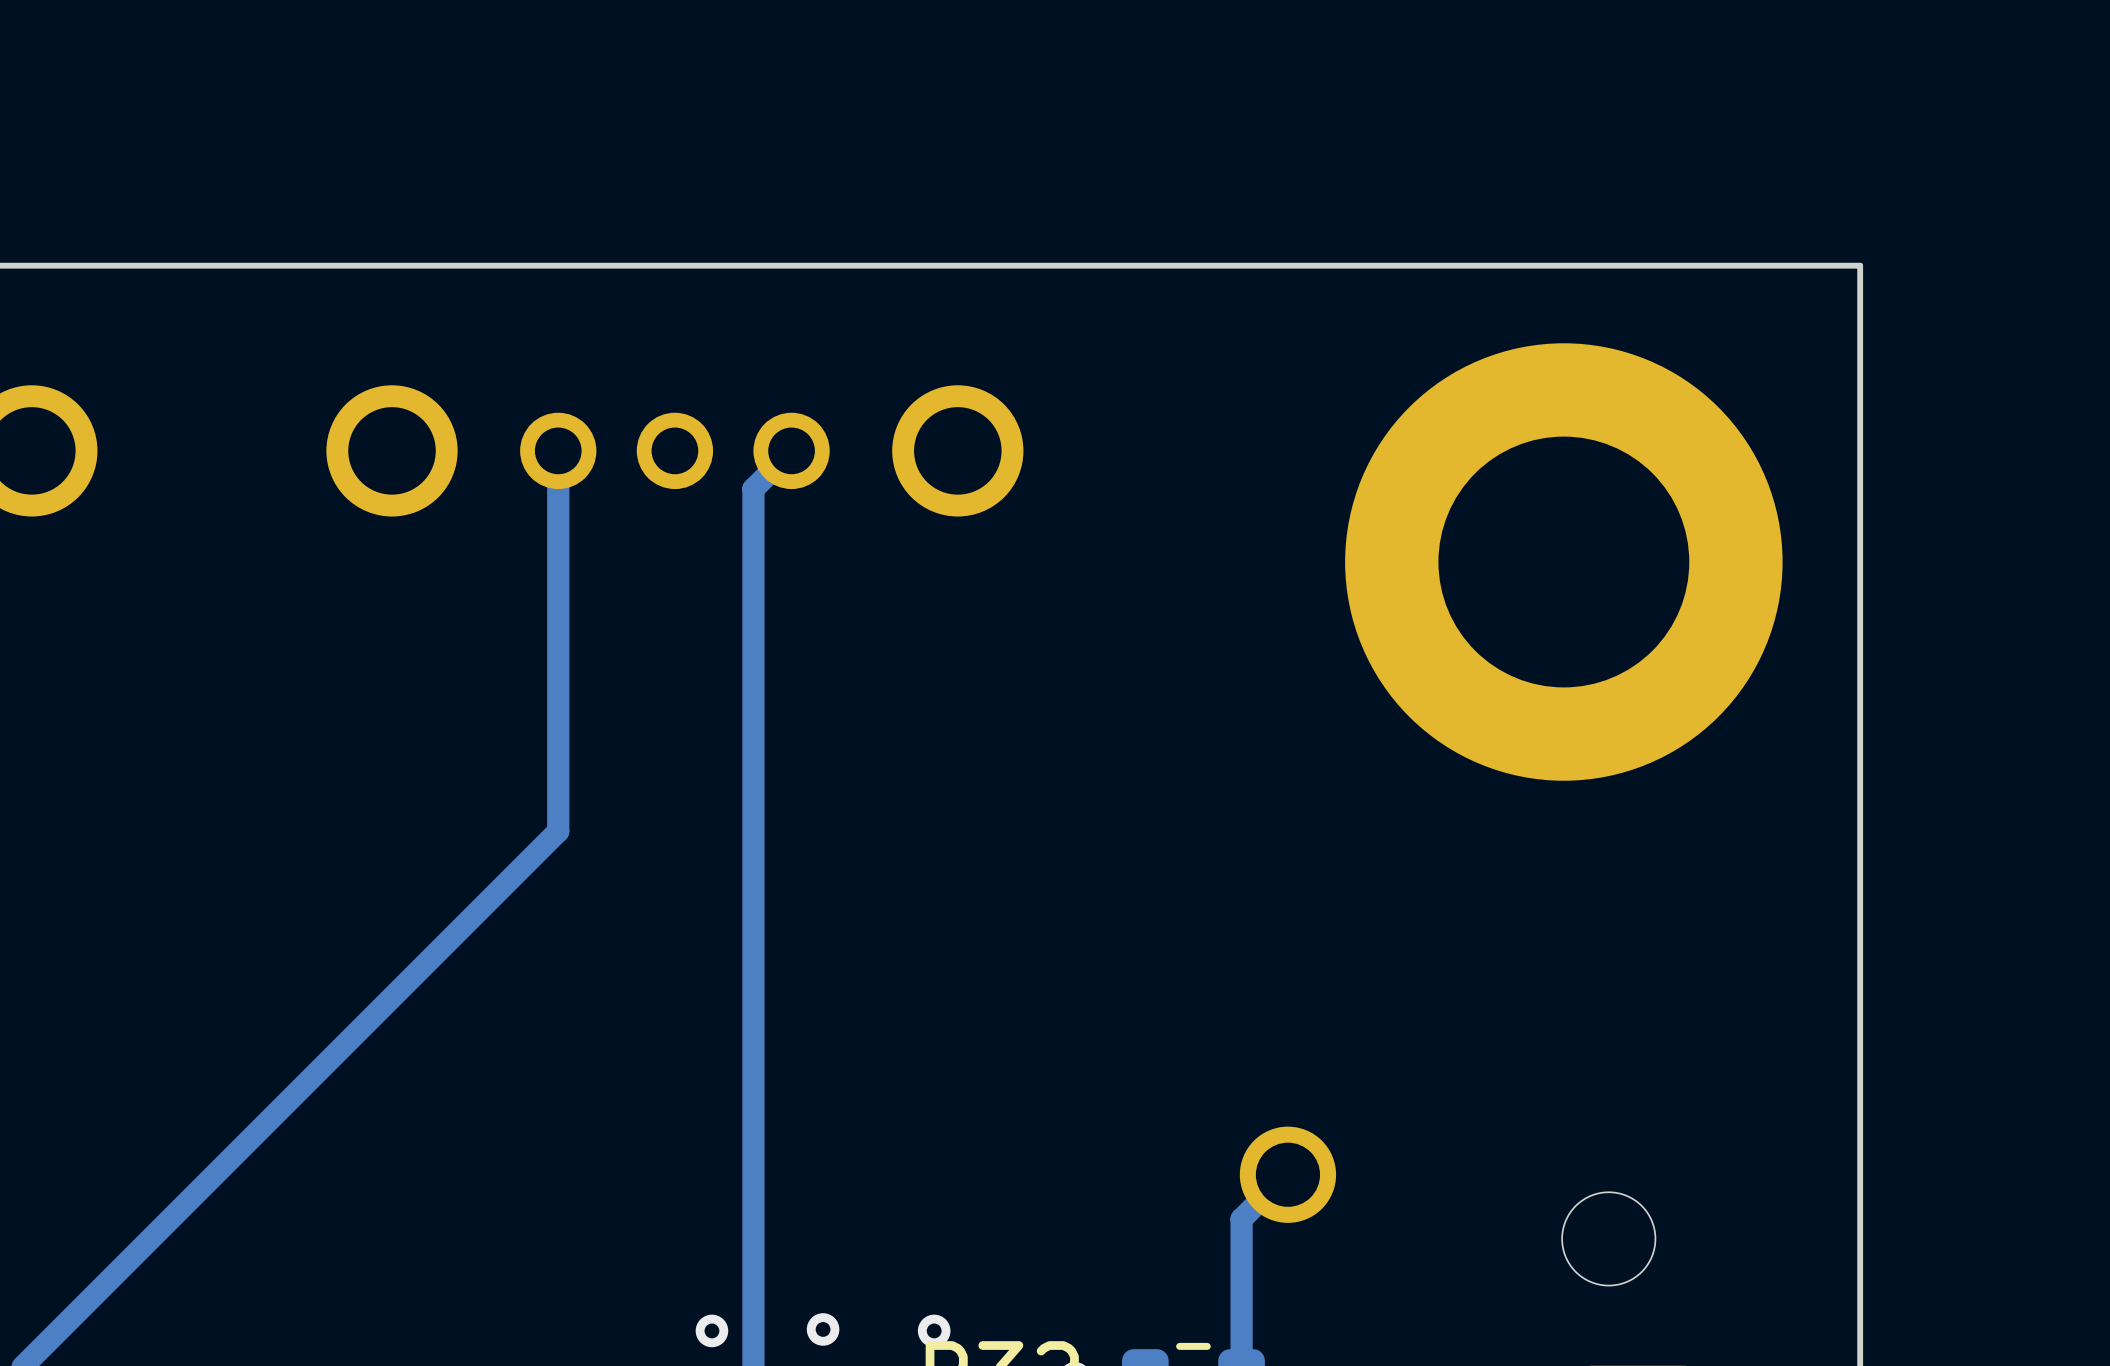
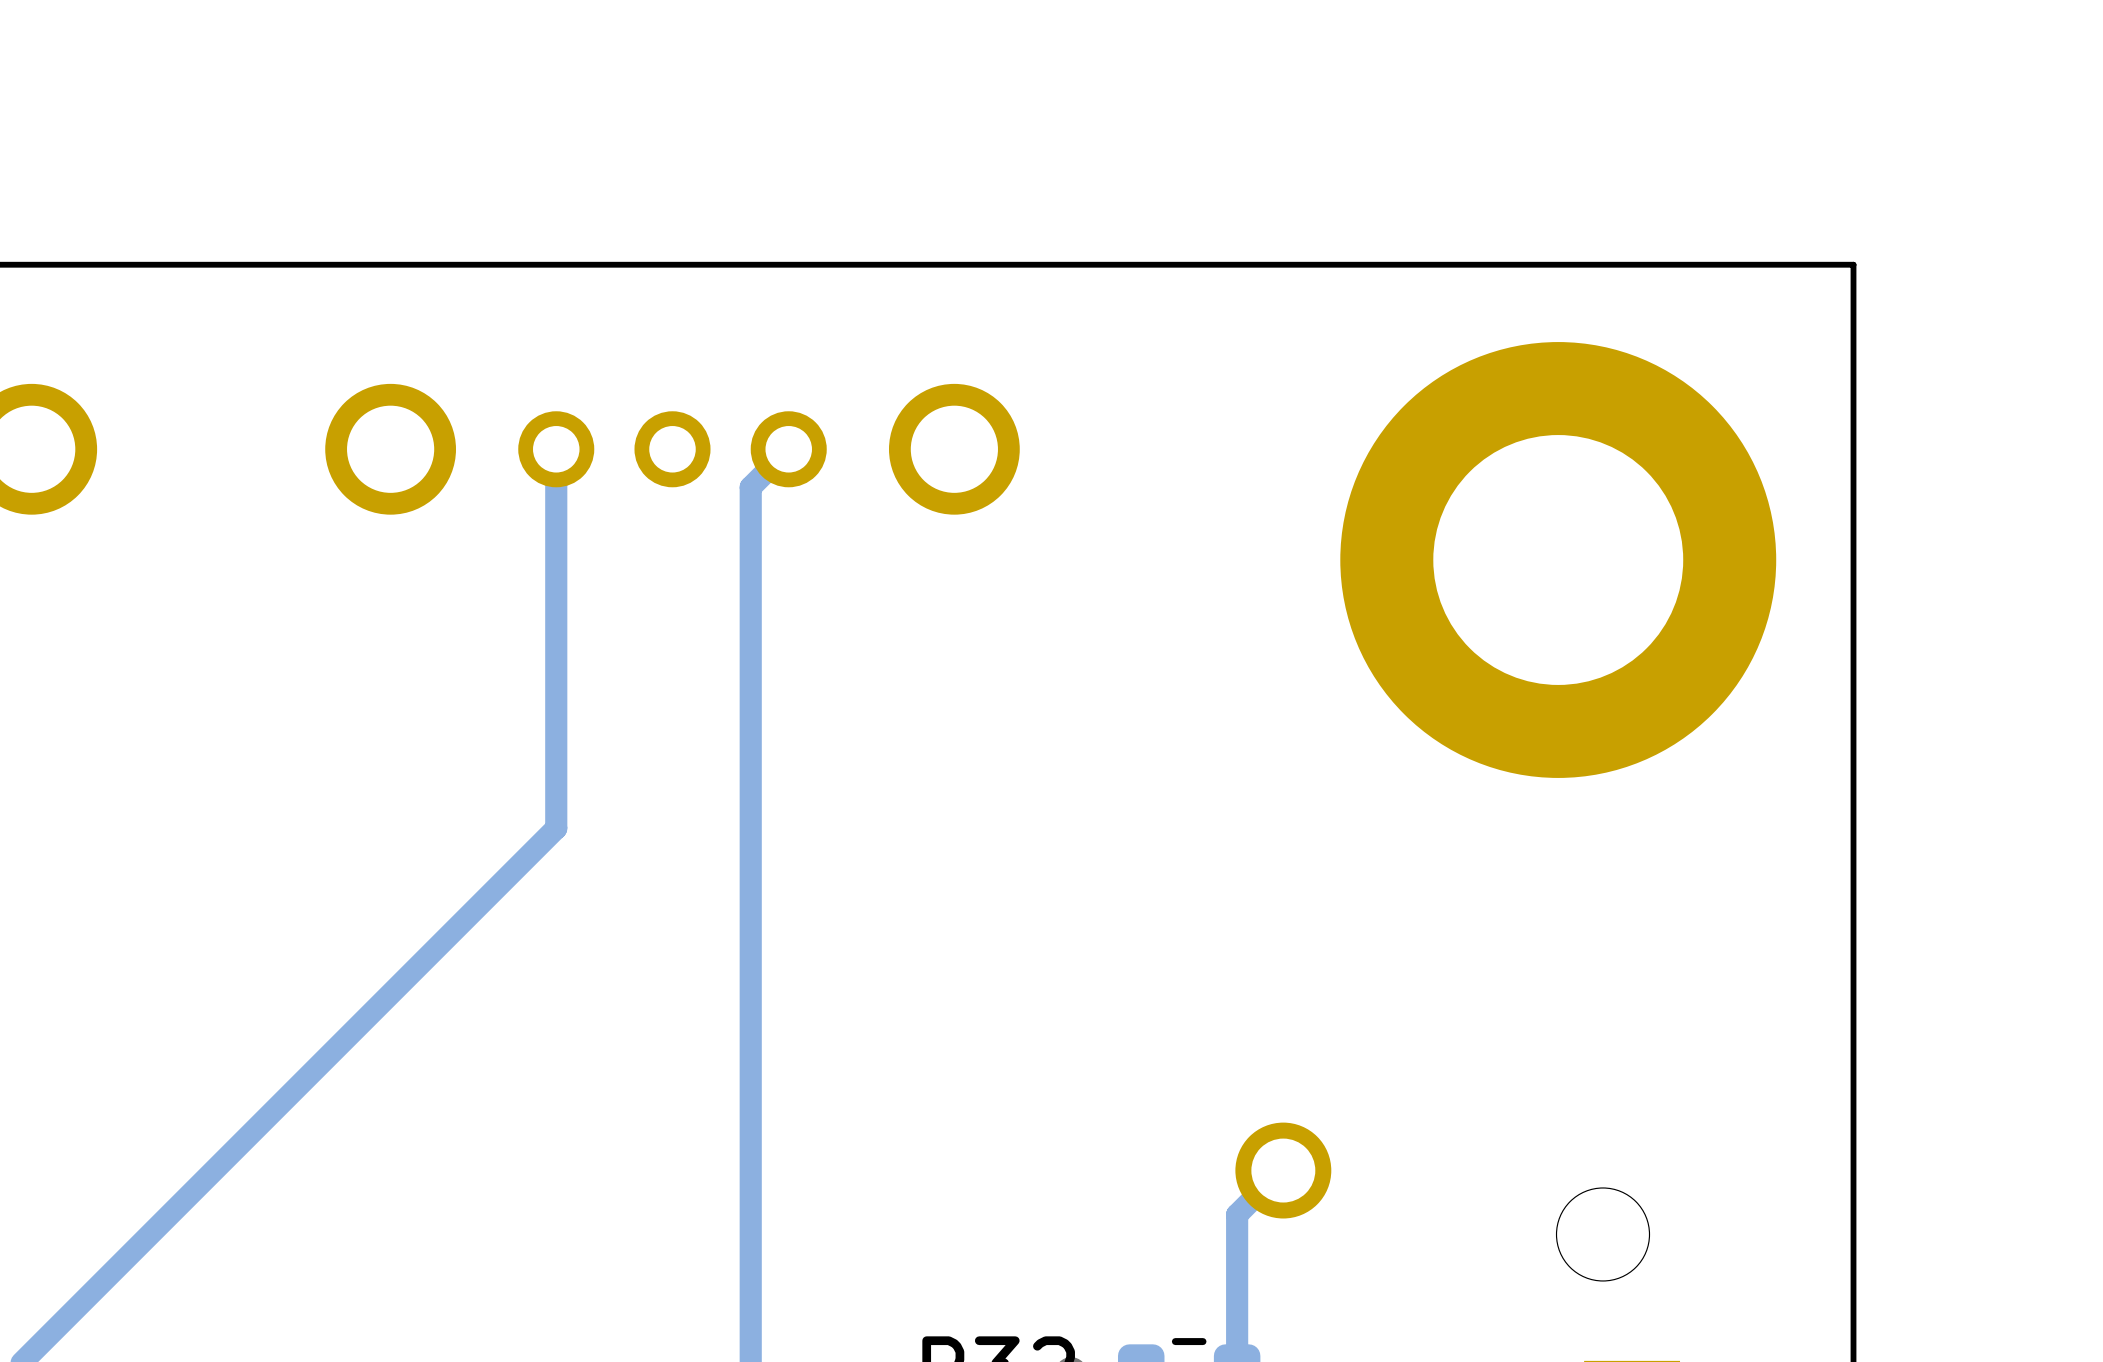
via: (823, 1329) -> none
via: (711, 1330) -> none
via: (934, 1330) -> none

